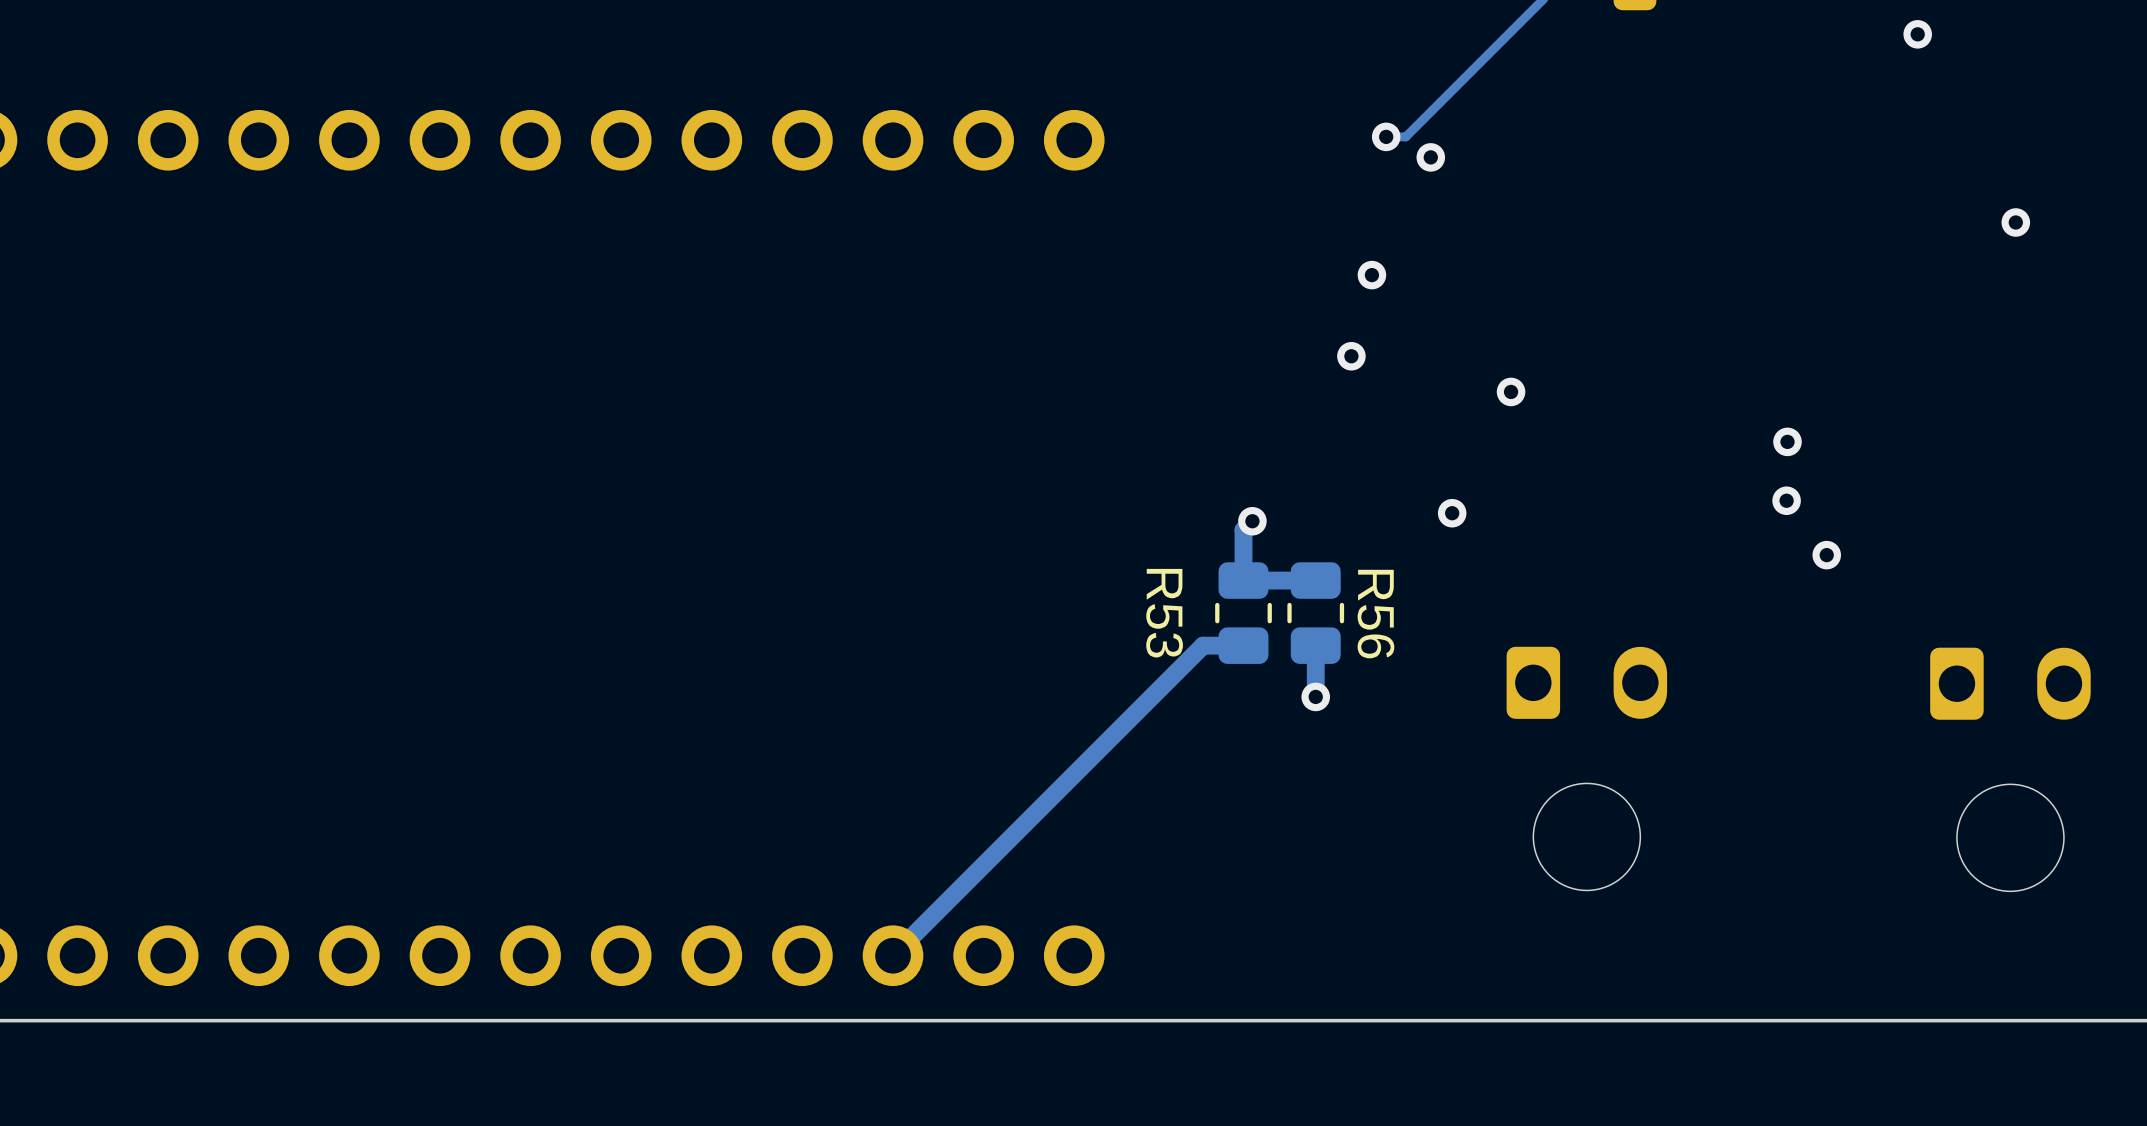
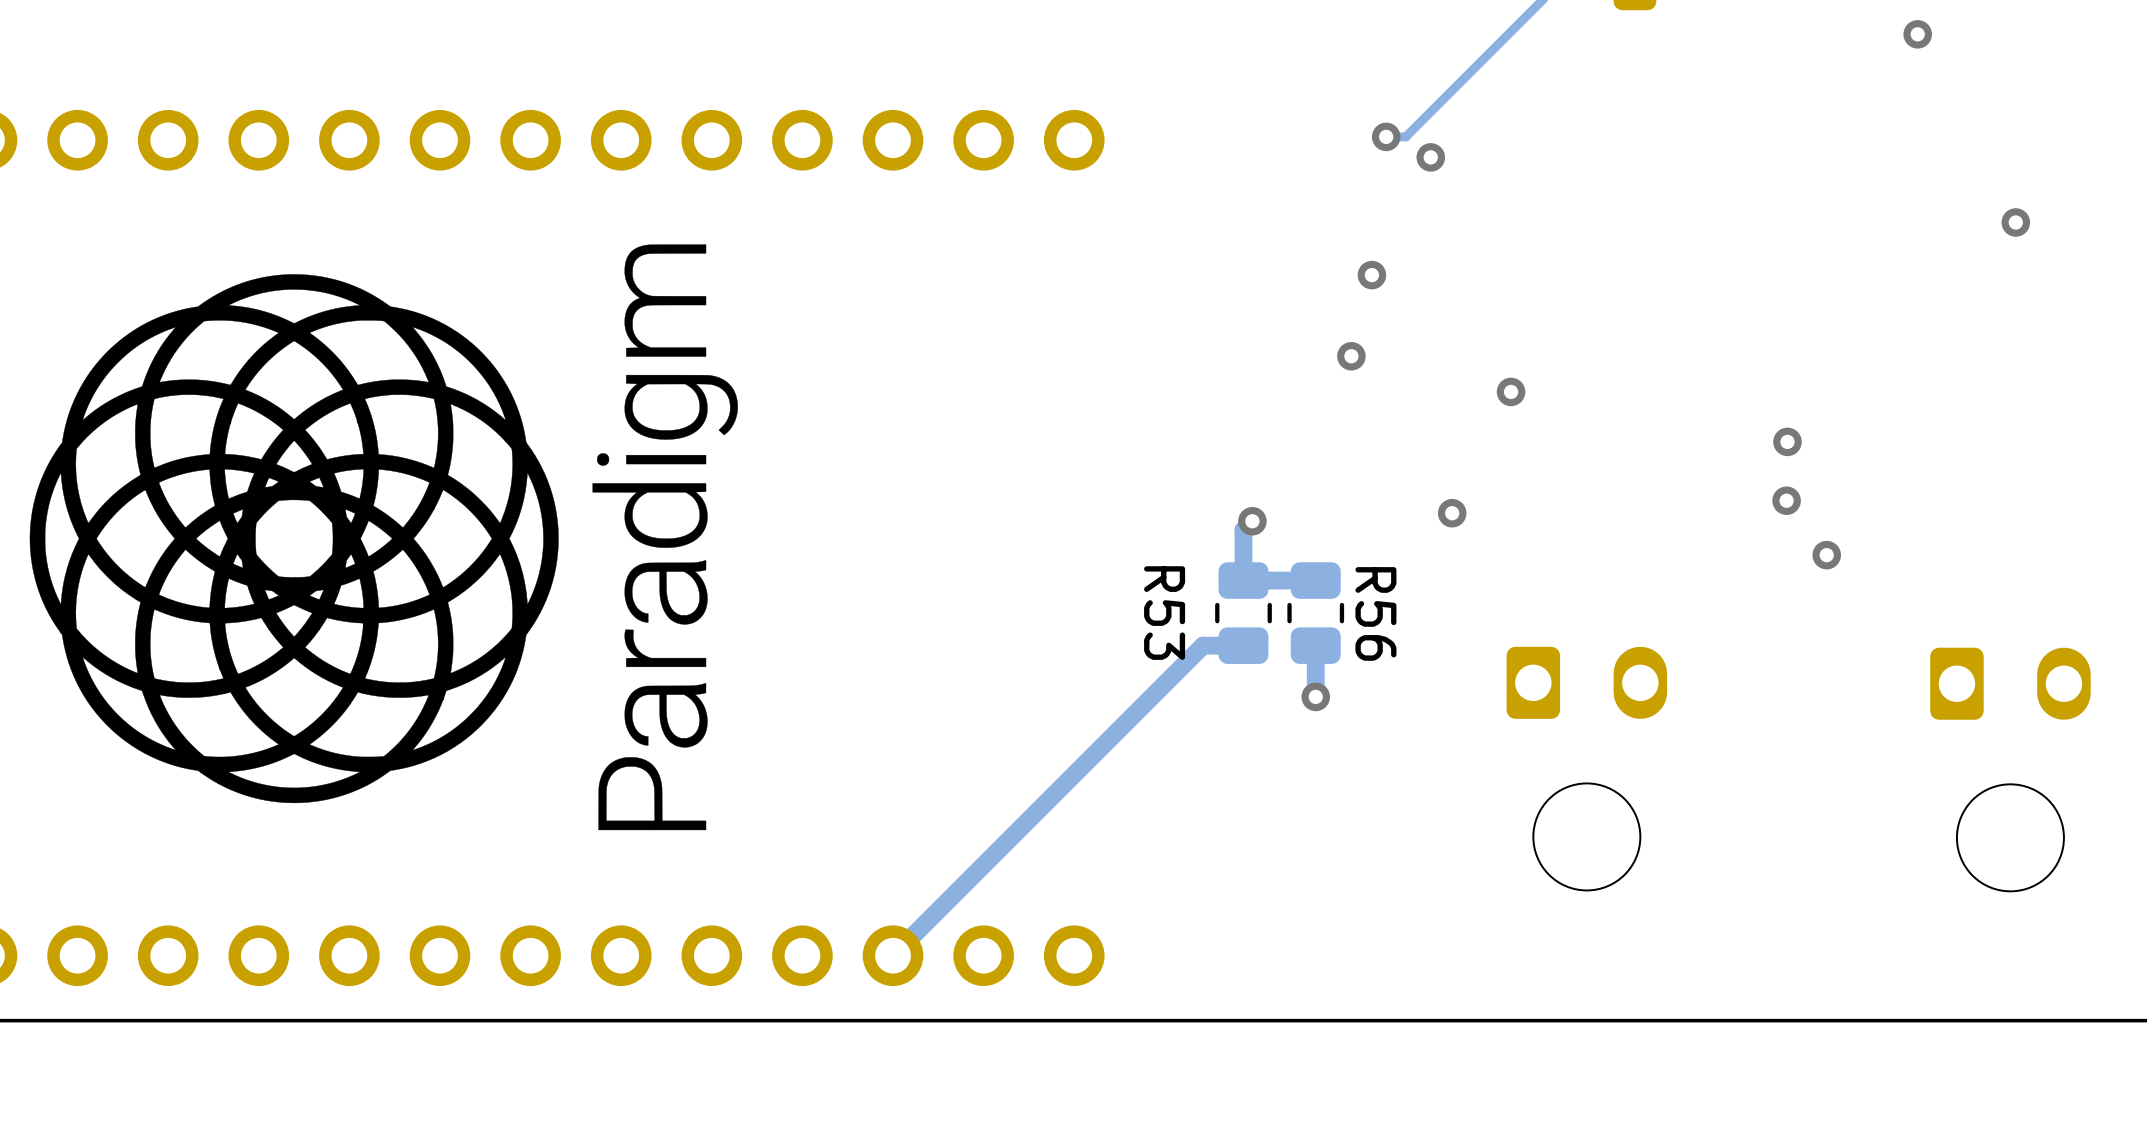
drawing: none -> [29, 244, 738, 831]

